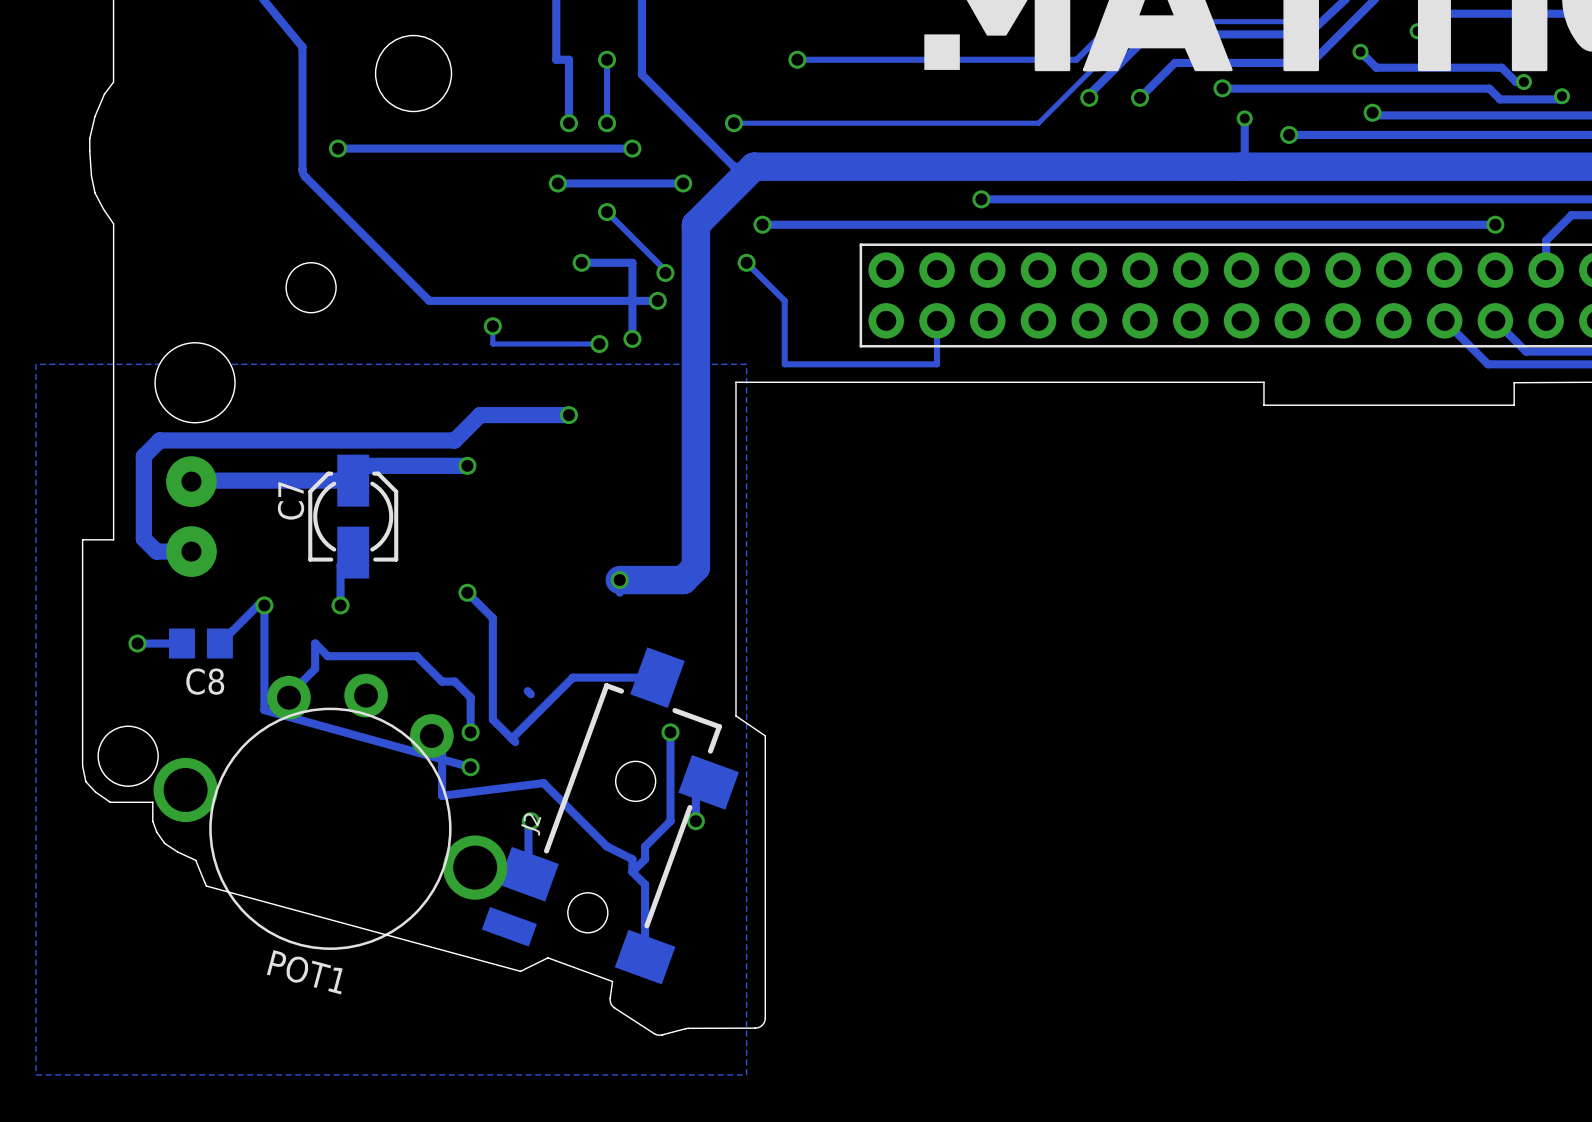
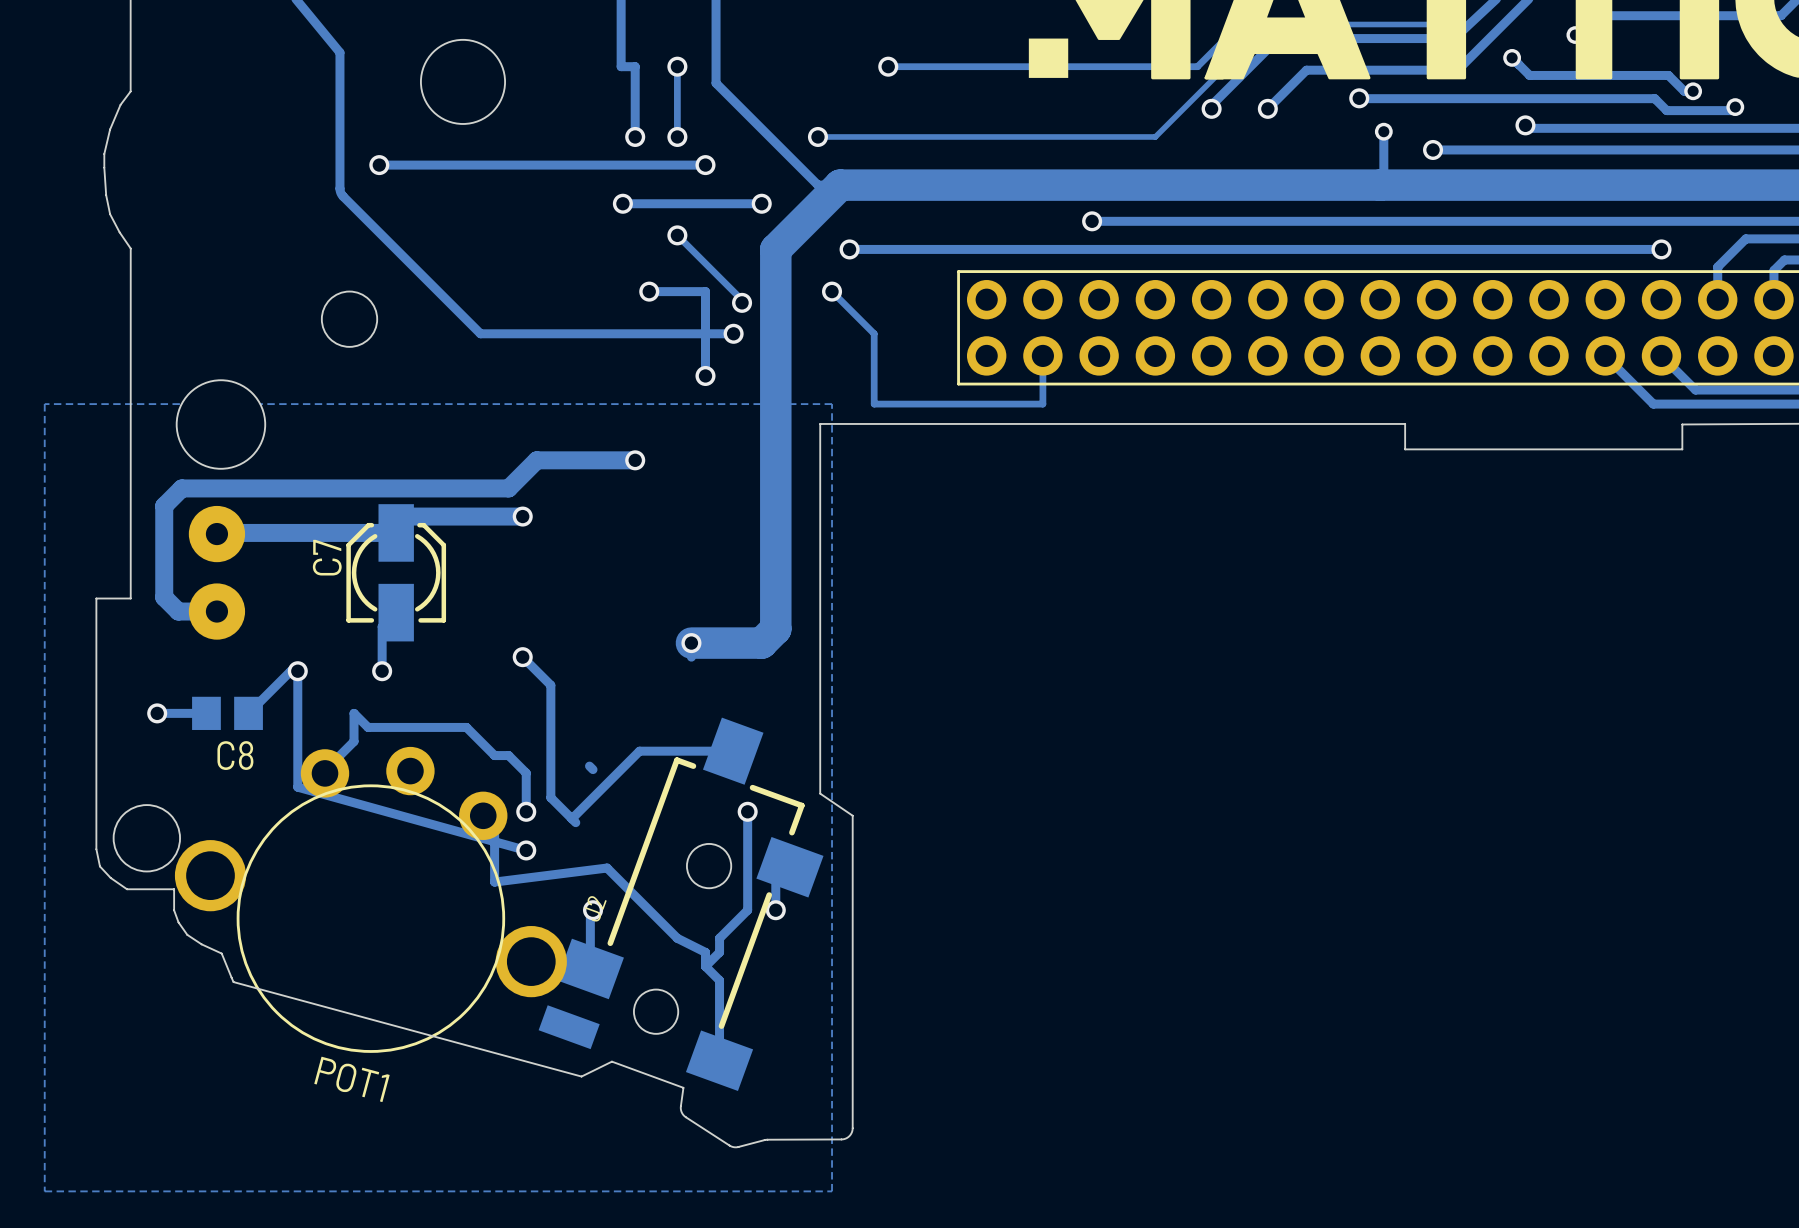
track: (492, 326) (492, 344) (599, 344) -> none
via: (492, 326) -> none
via: (599, 344) -> none

